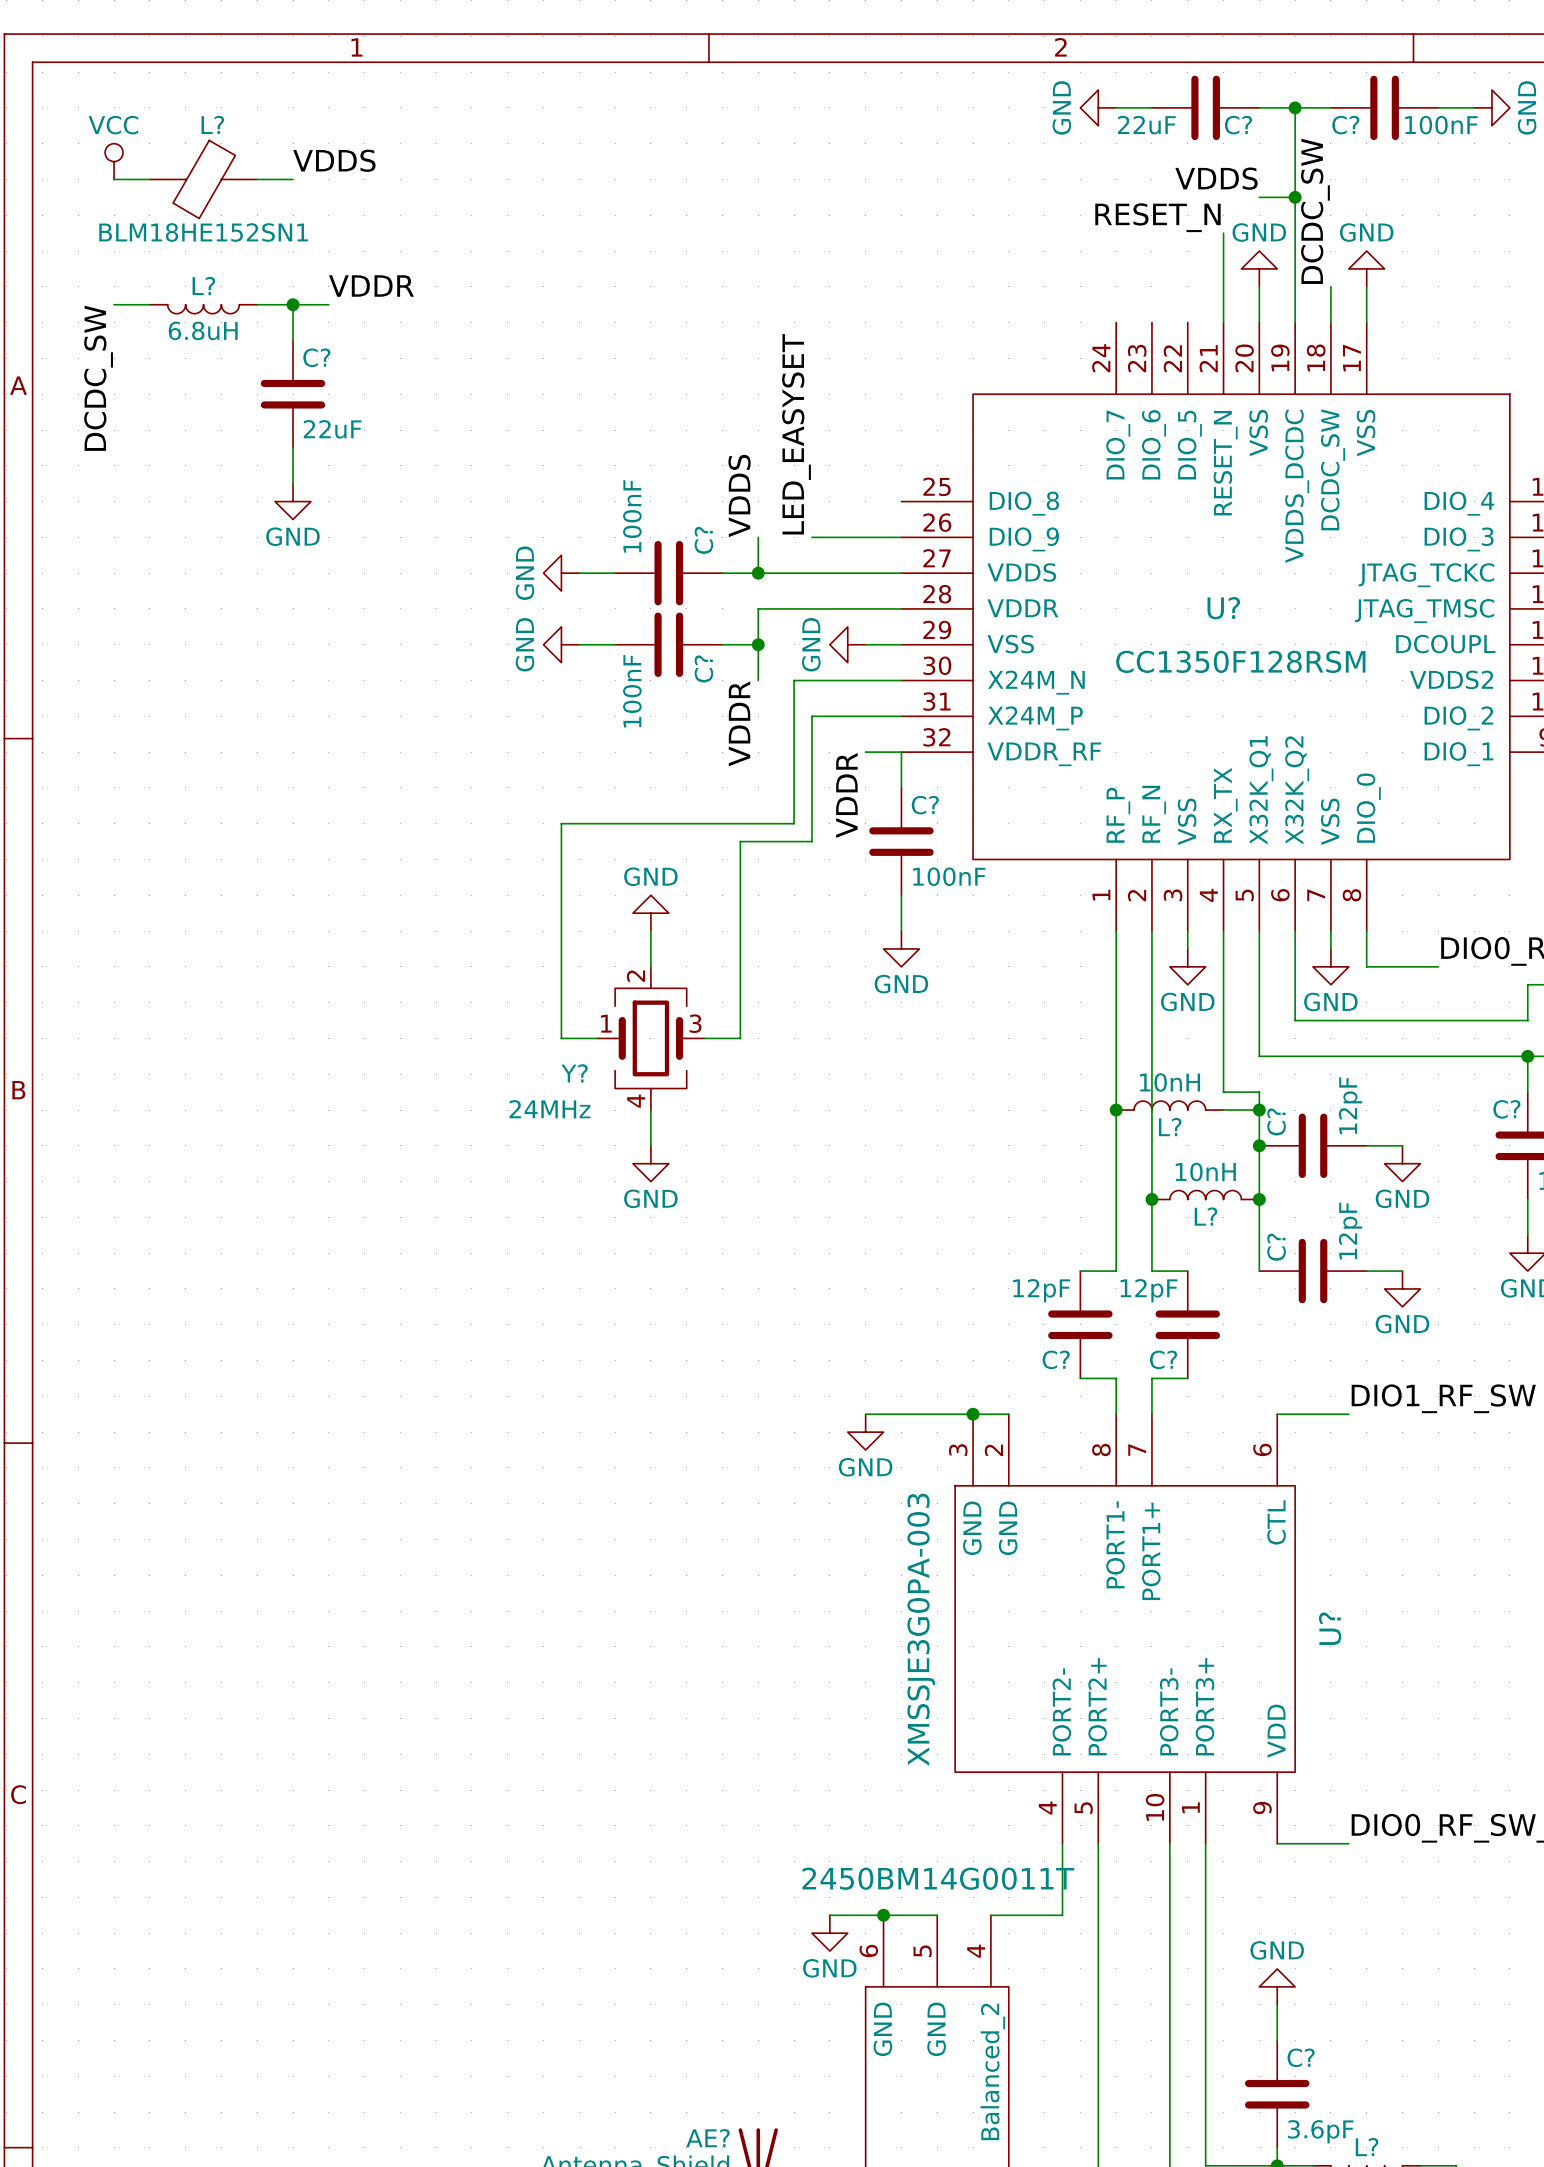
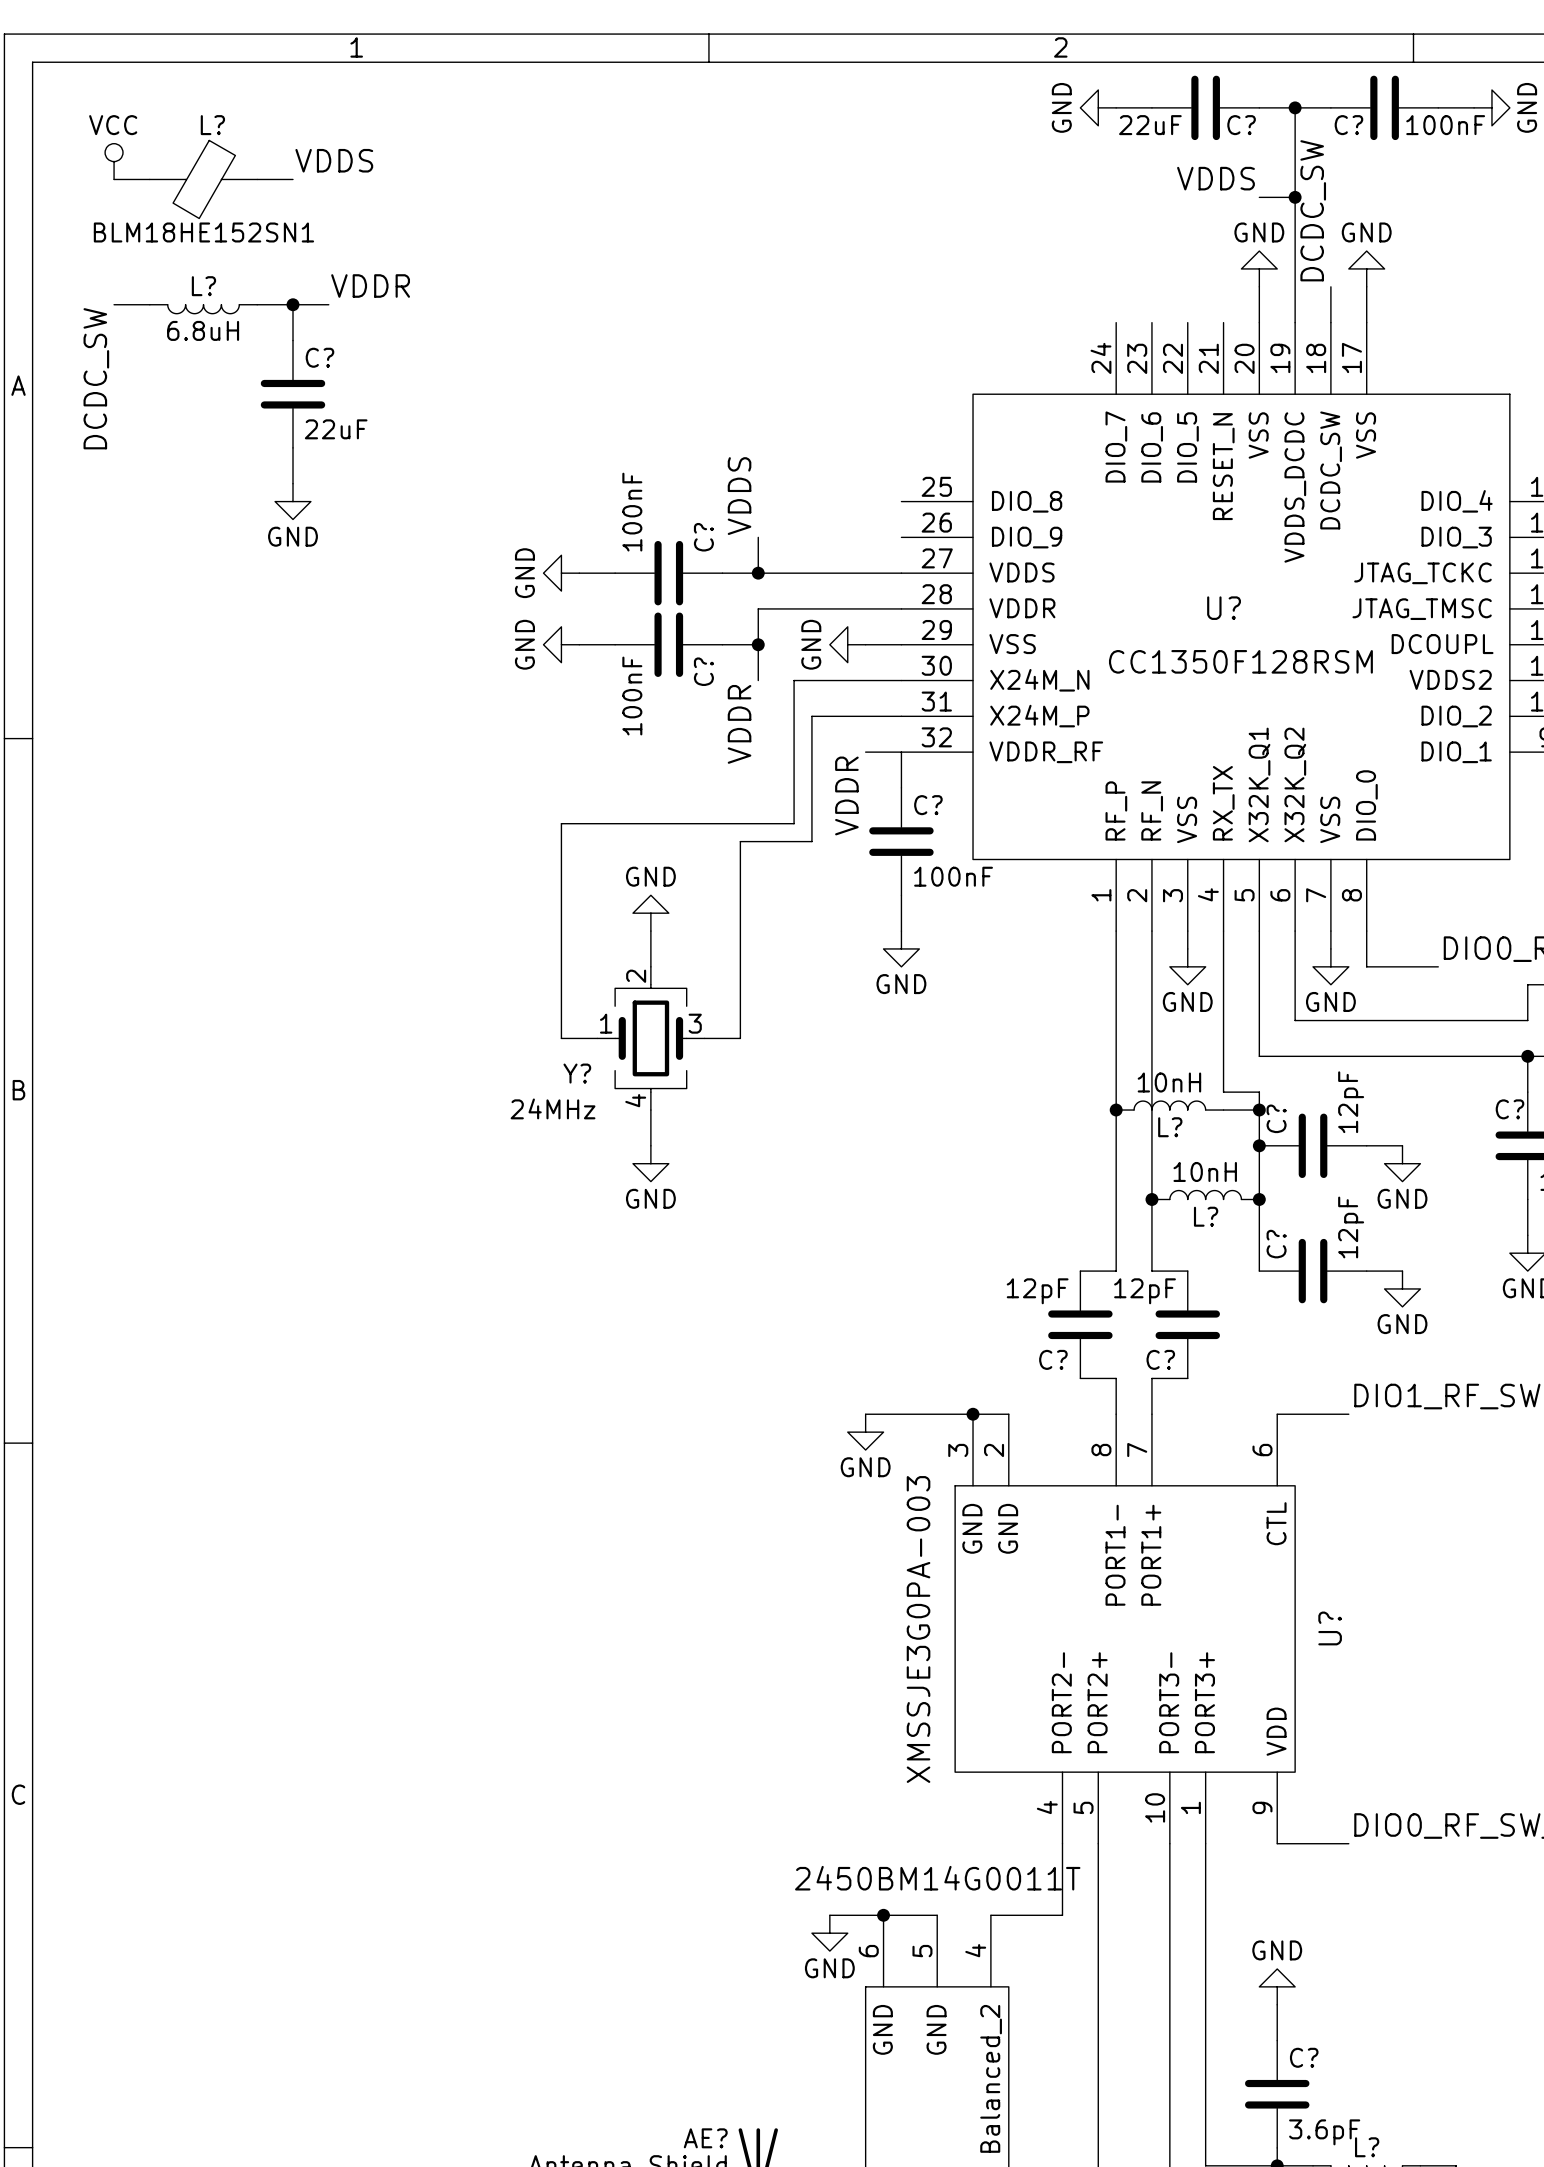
label: RESET_N (1157, 217) -> none
wire: (1223, 233) (1223, 322) -> none
label: LED_EASYSET (796, 434) -> none
wire: (811, 537) (901, 537) -> none

